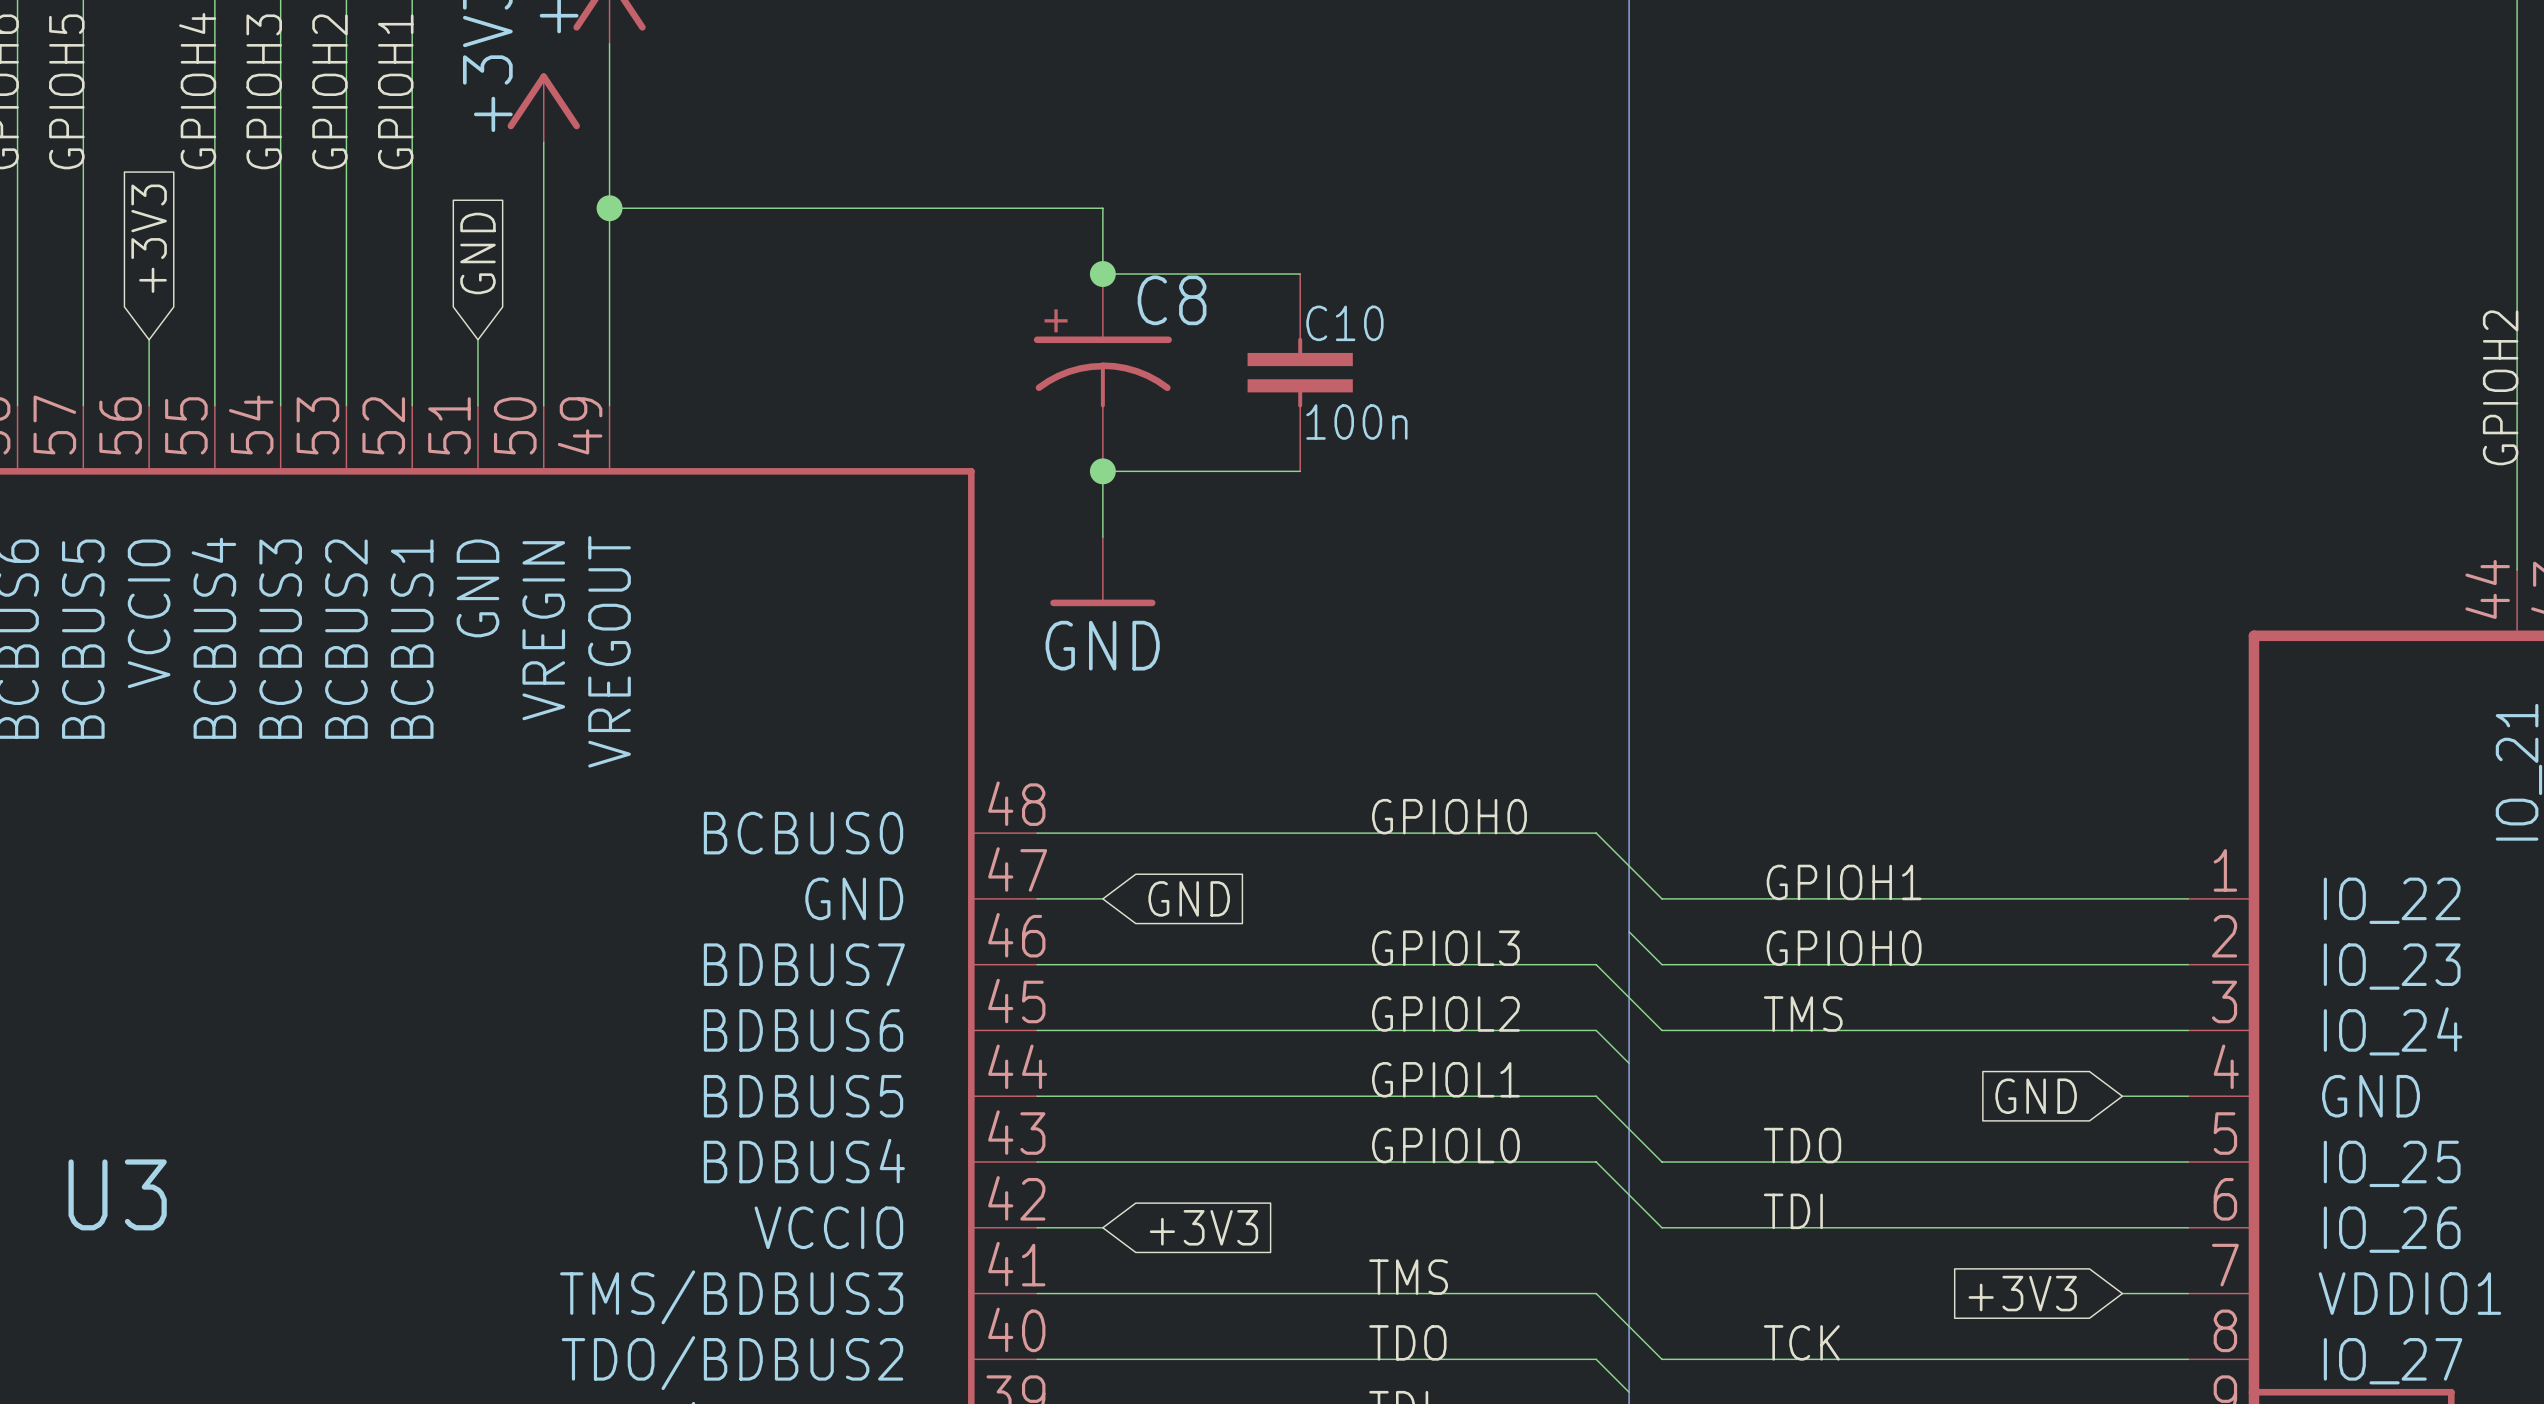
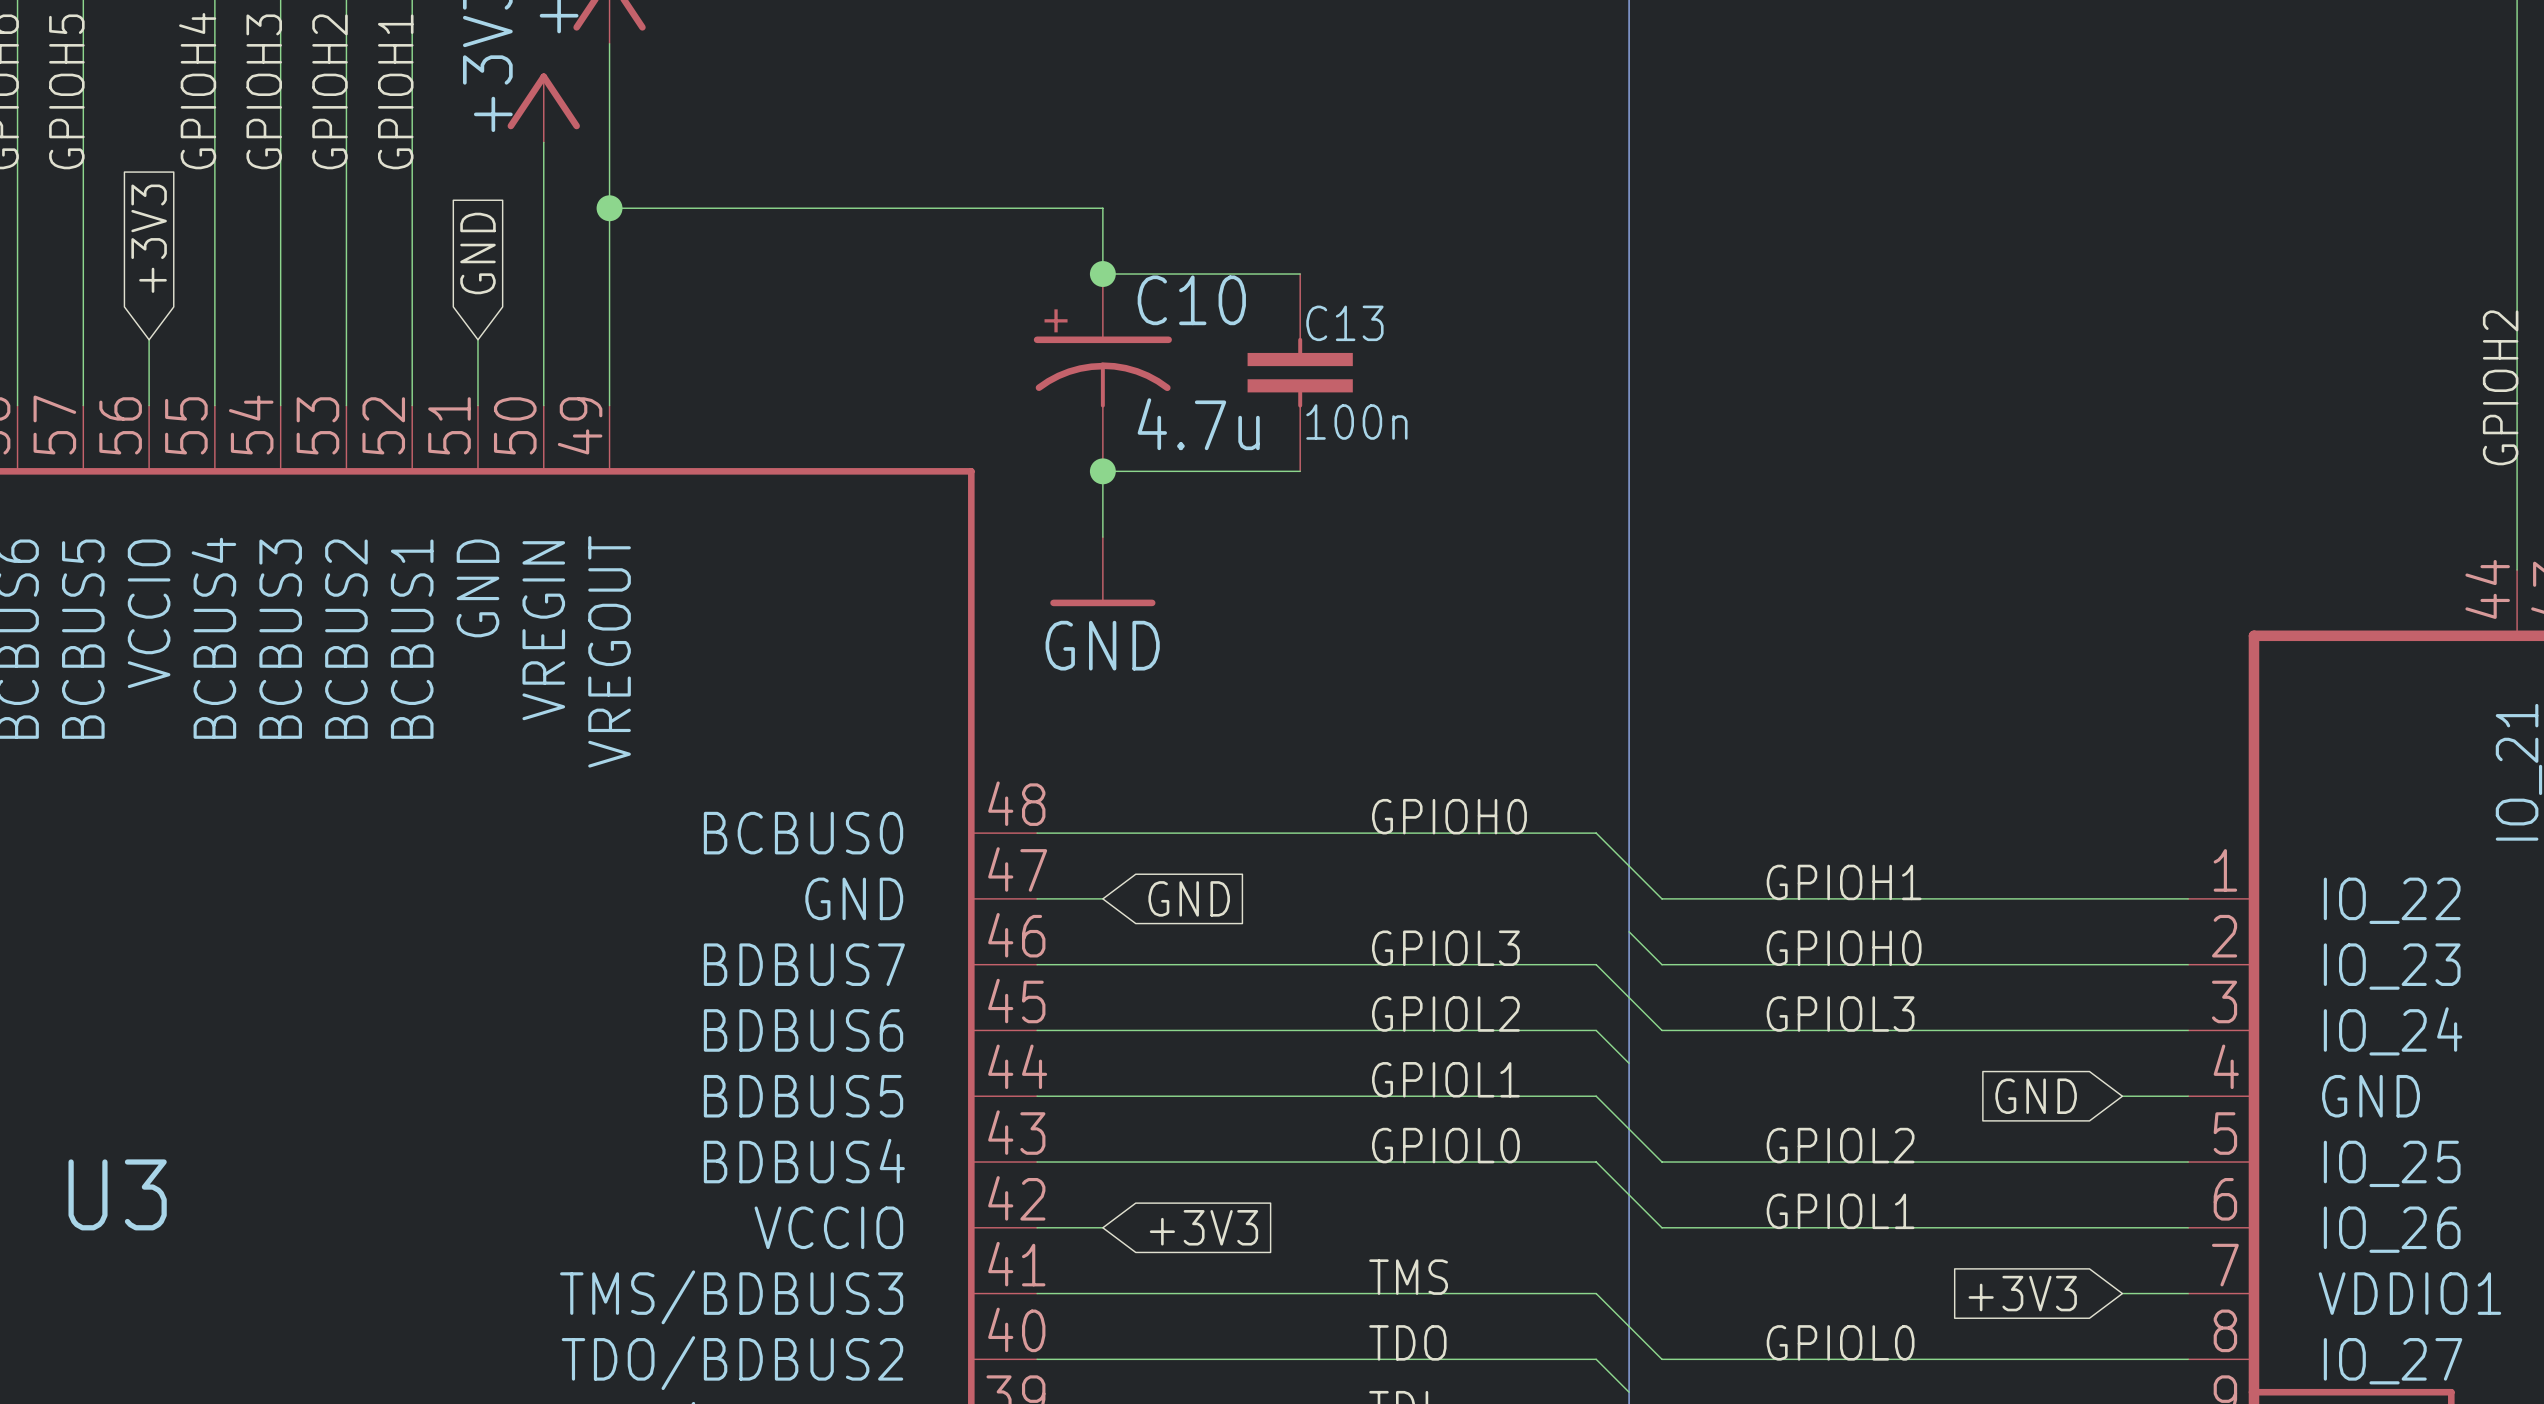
C8 name: C8 (1172, 300) -> C10 (1191, 300)
C10 name: C10 (1344, 323) -> C13 (1344, 323)
C8 value: none -> 4.7u (1198, 424)
label: TMS (1803, 1014) -> GPIOL3 (1840, 1014)
label: TDO (1802, 1145) -> GPIOL2 (1840, 1145)
label: TDI (1793, 1211) -> GPIOL1 (1840, 1211)
label: TCK (1801, 1342) -> GPIOL0 (1840, 1342)

